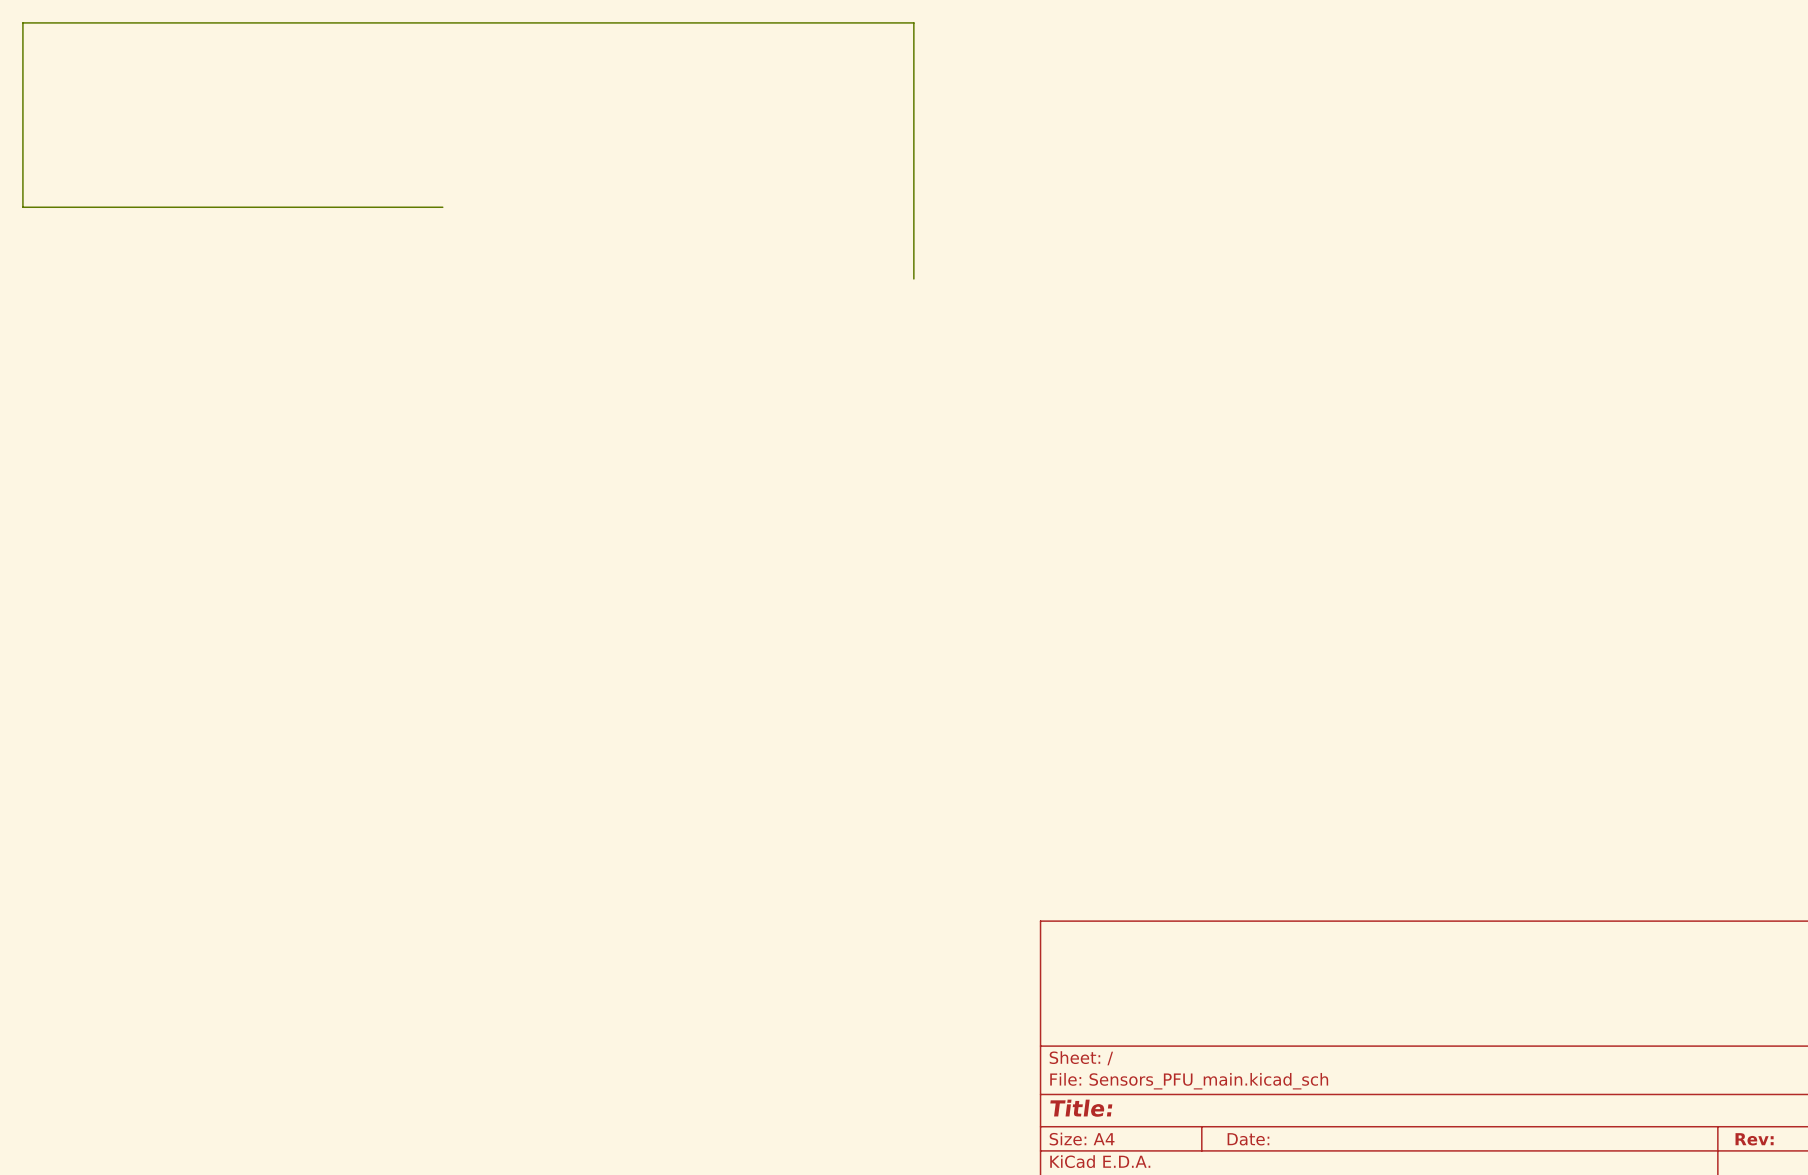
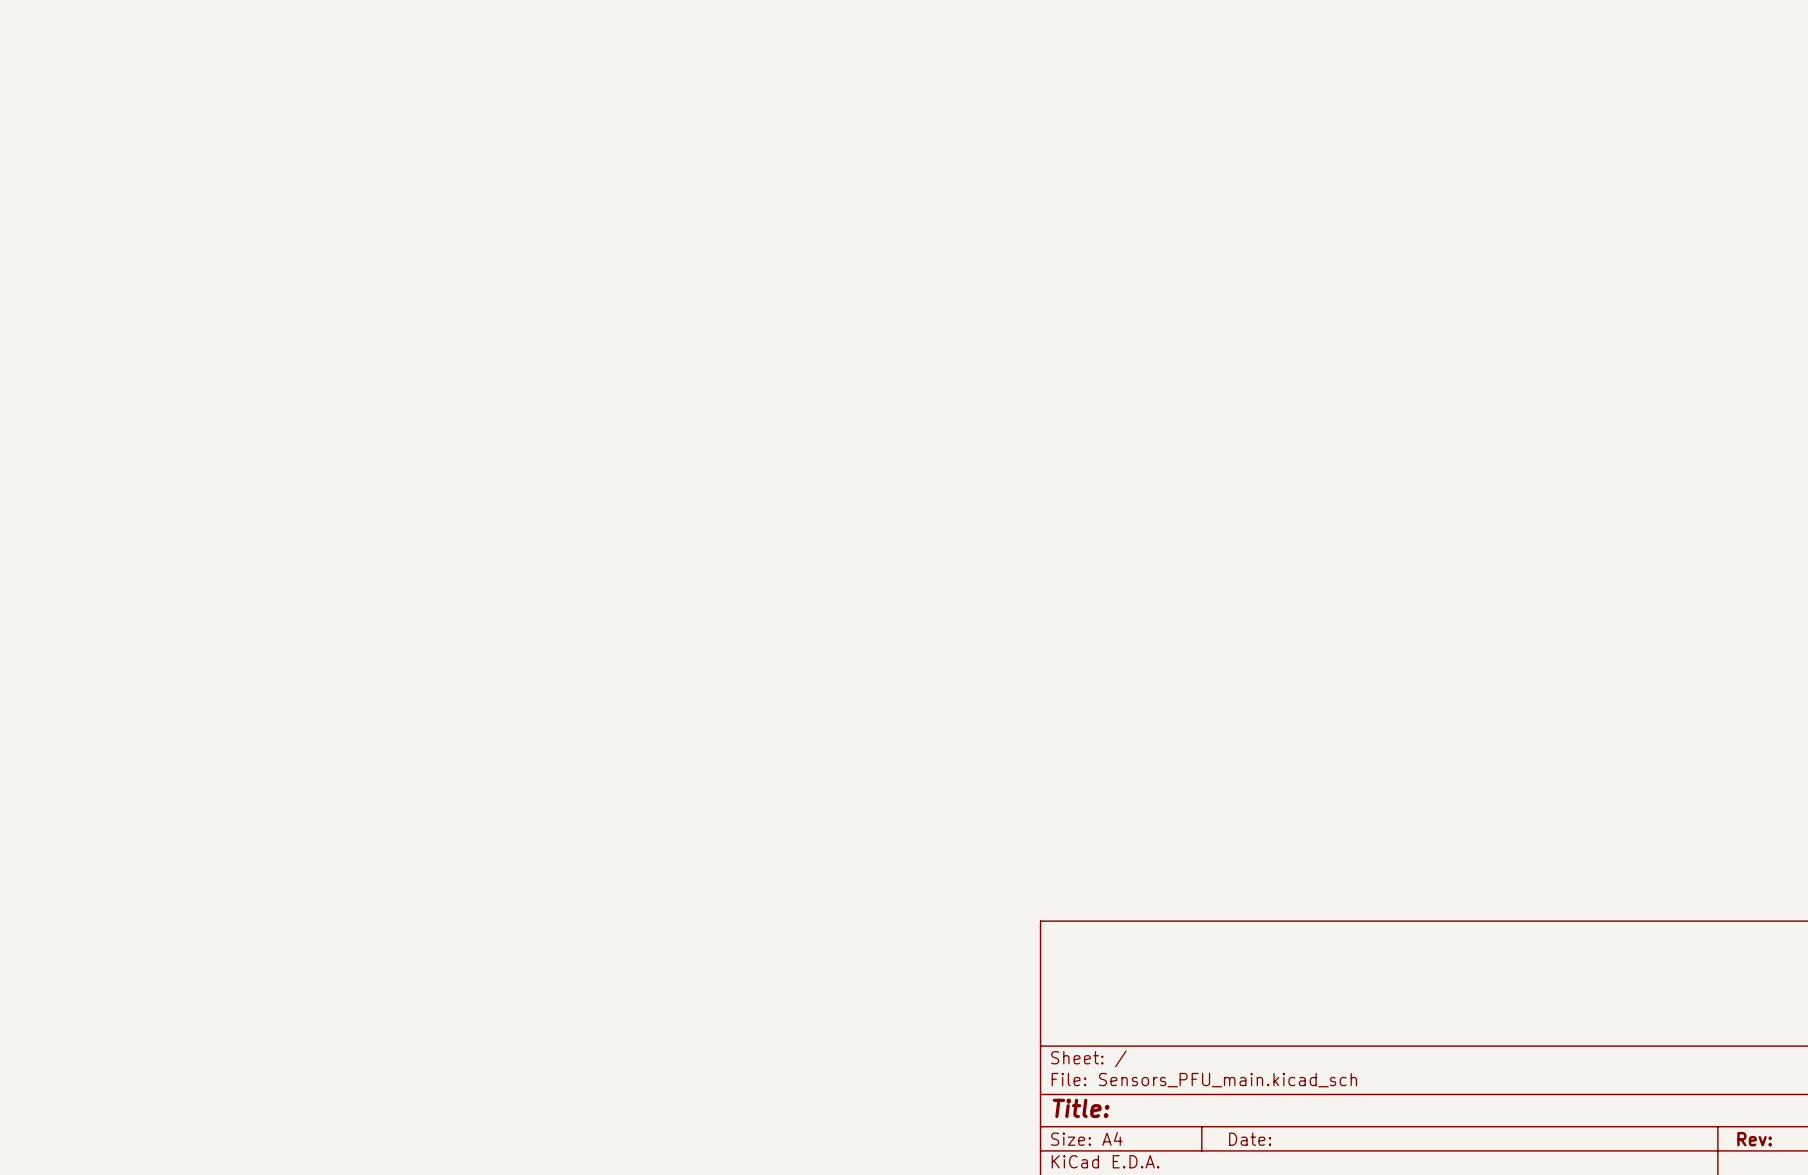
wire: (442, 207) (22, 207) (22, 22) (913, 22) (913, 278) -> none

